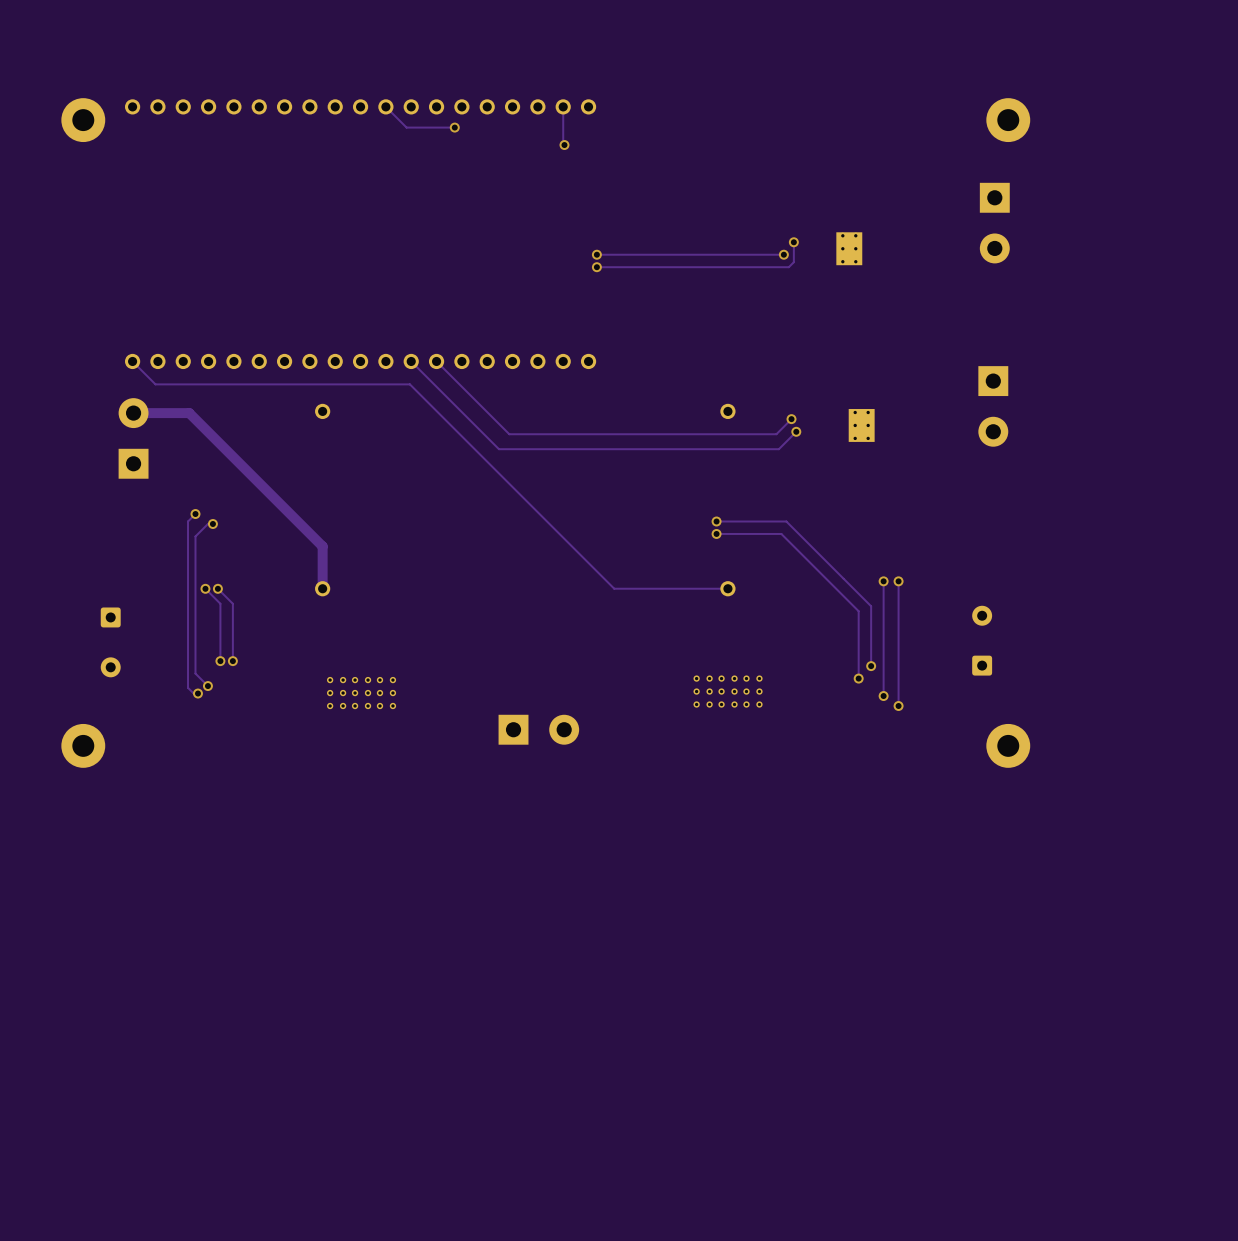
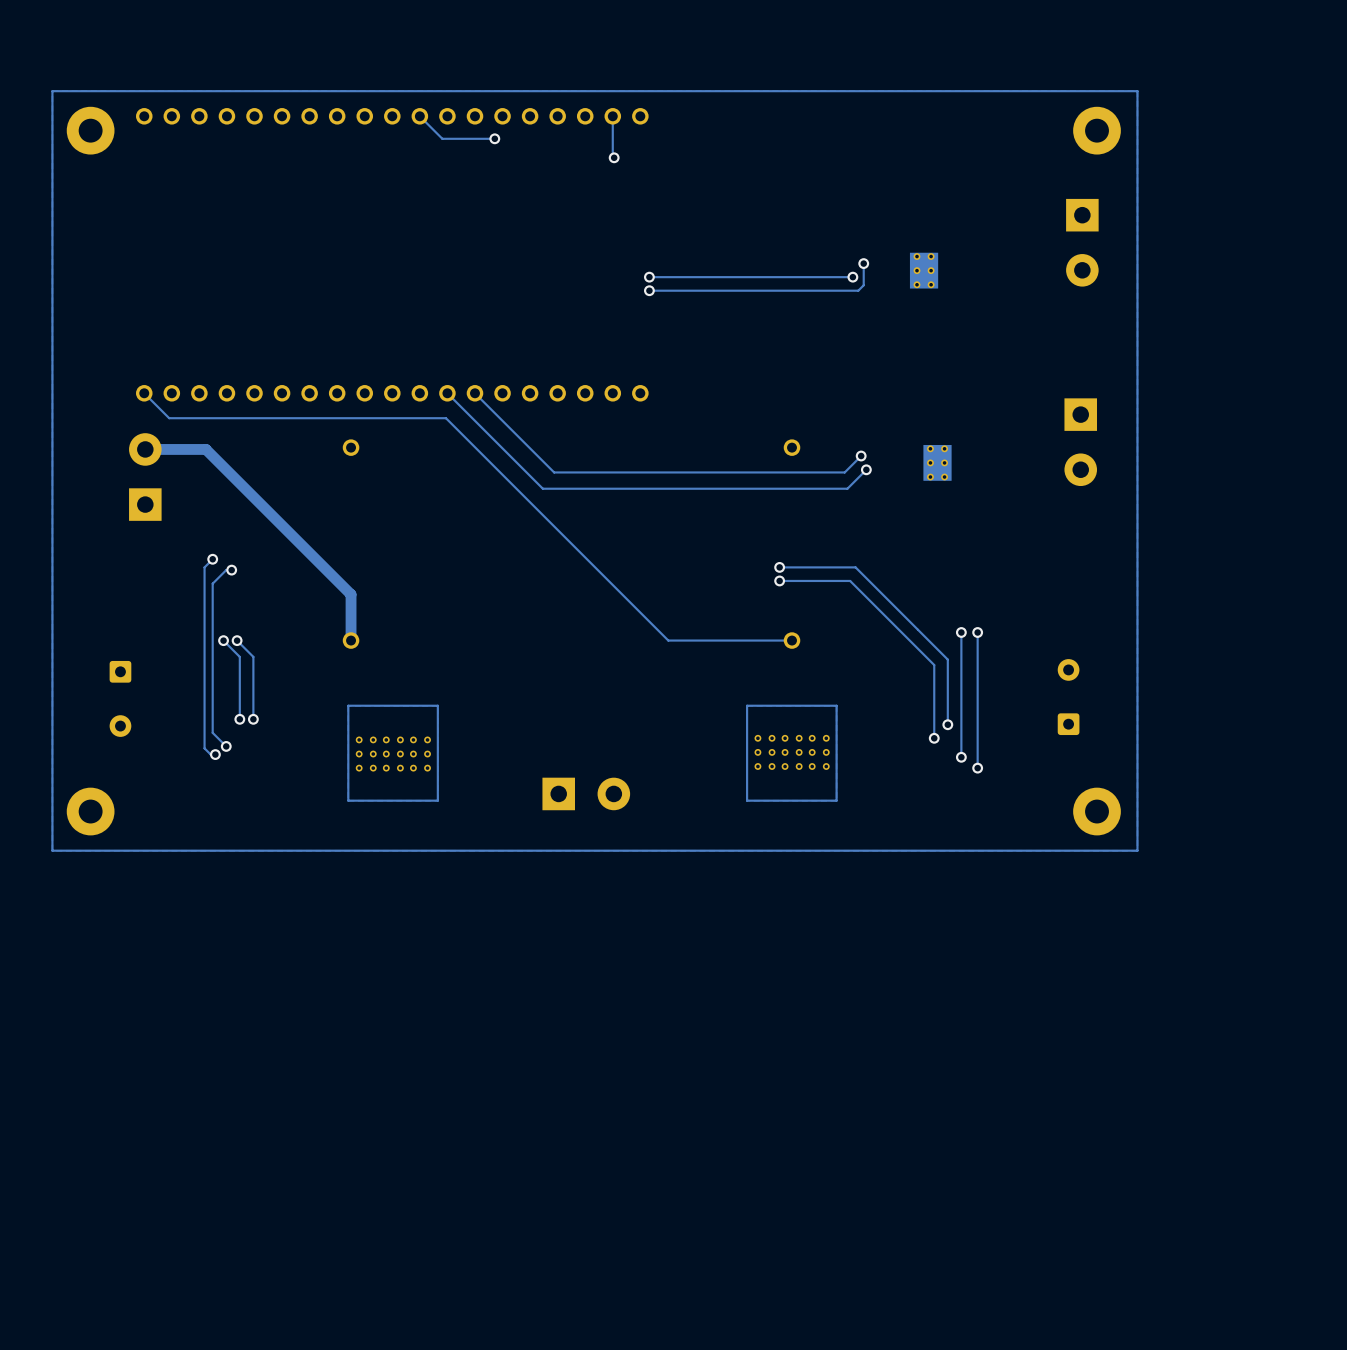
track: none -> (1137, 91) (52, 91) (52, 850) (1137, 850) (1137, 91)
track: none -> (437, 705) (348, 705) (348, 800) (437, 800) (437, 705)
track: none -> (836, 705) (747, 705) (747, 800) (836, 800) (836, 705)

